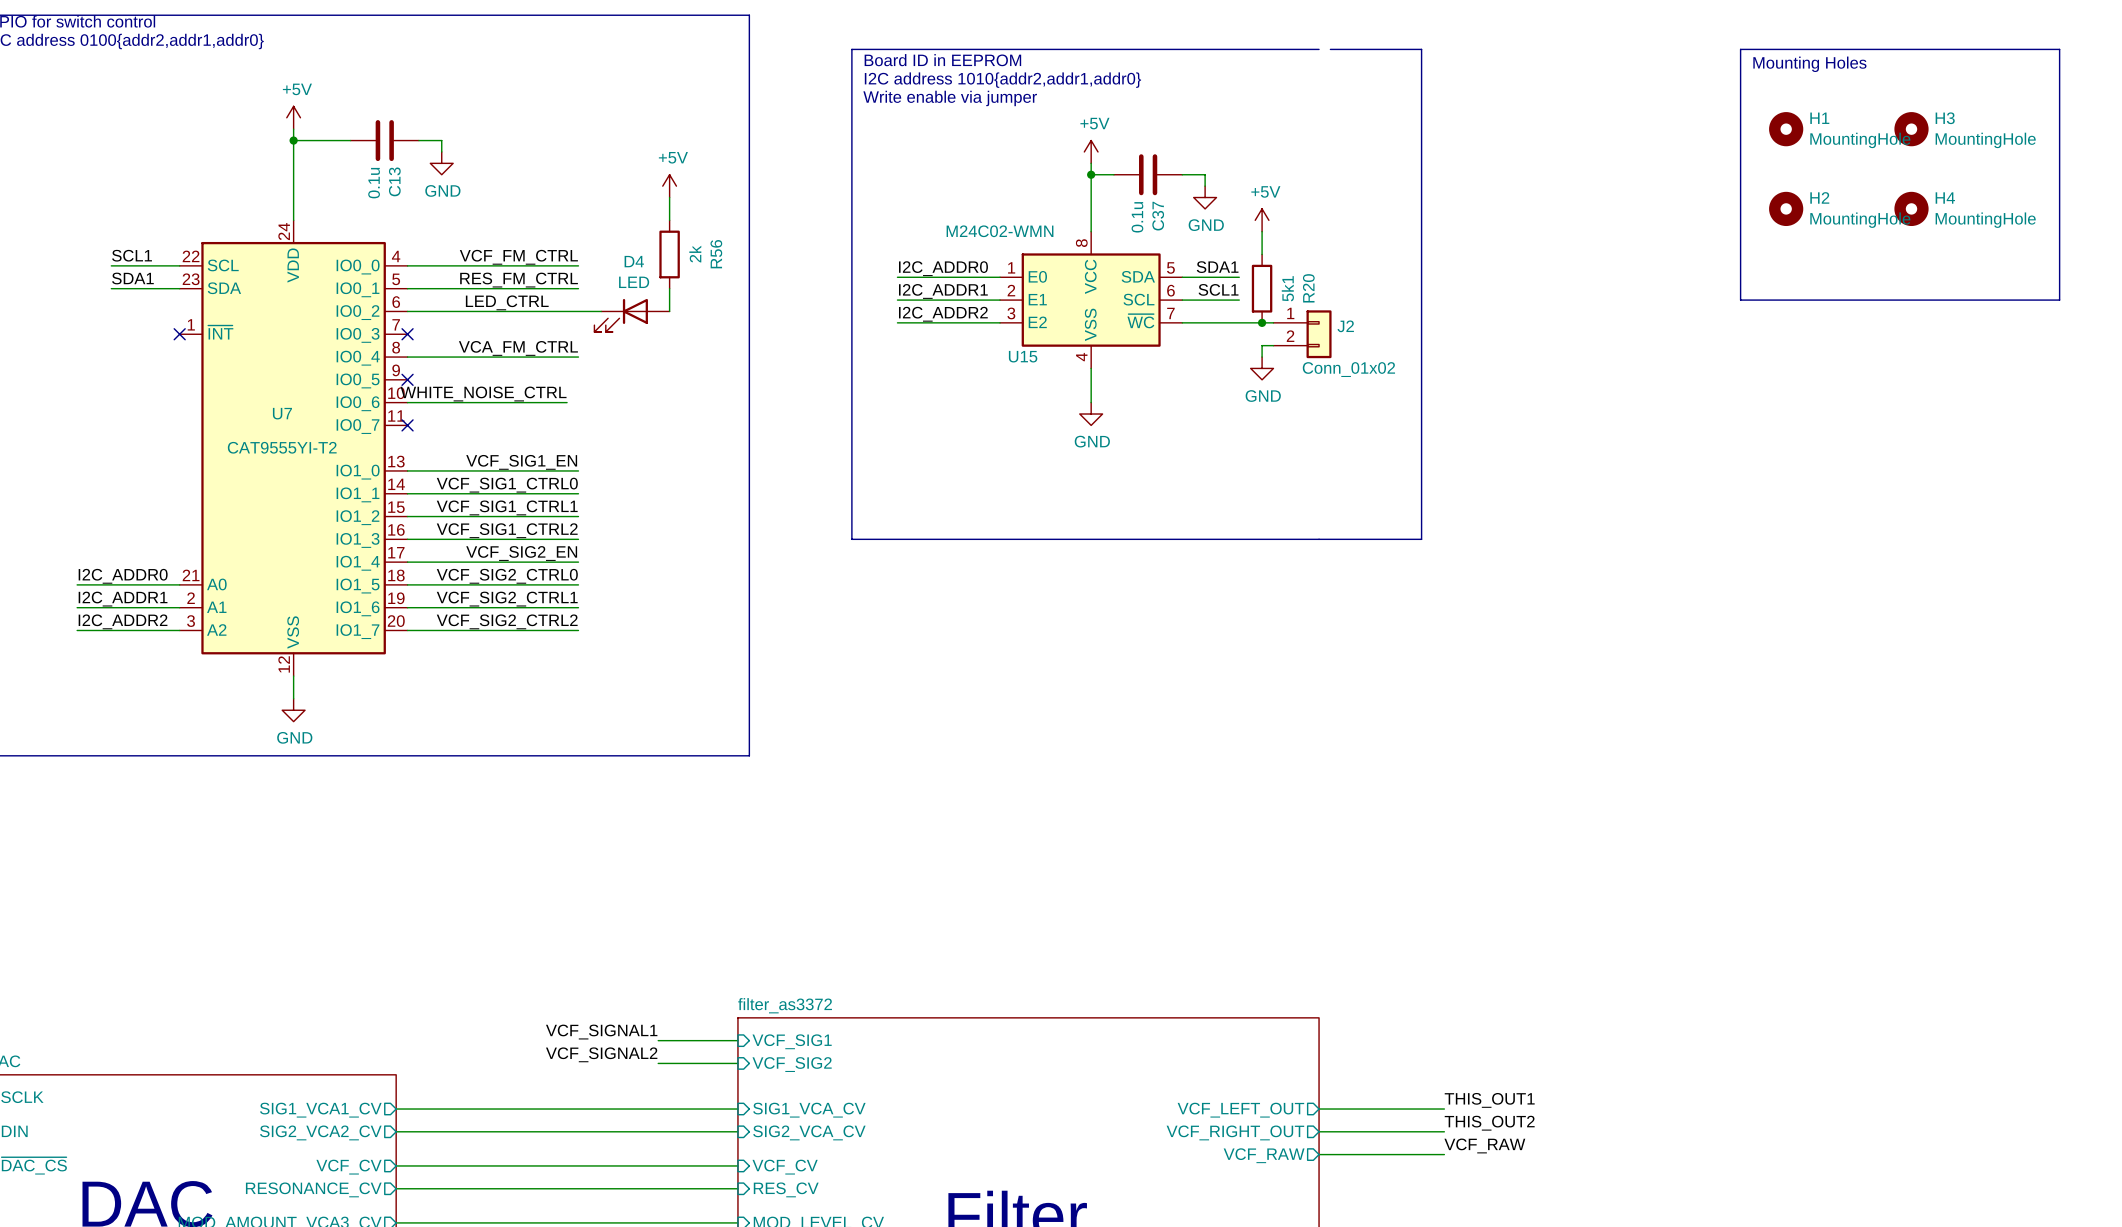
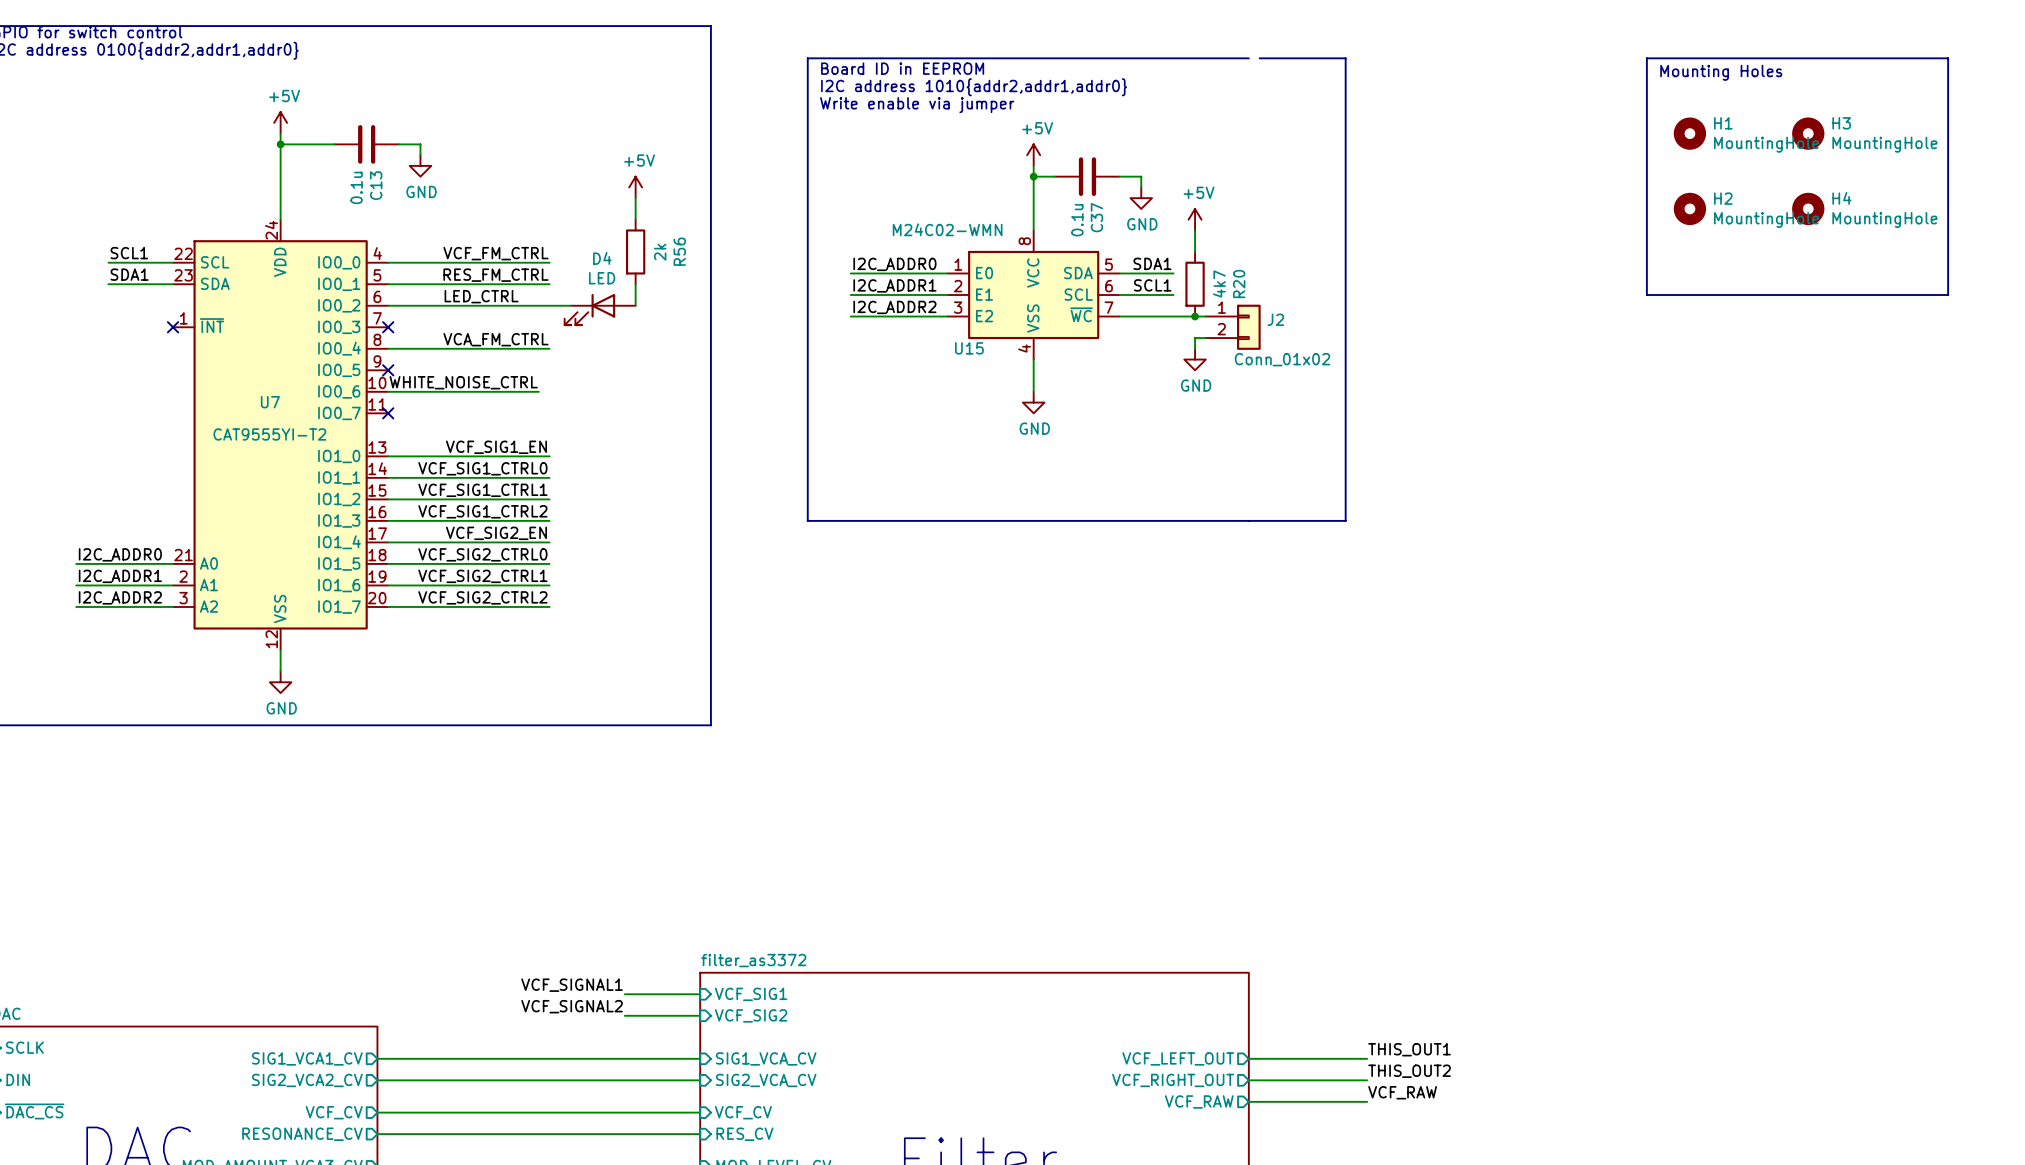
R20 value: 5k1 (1287, 288) -> 4k7 (1219, 283)

